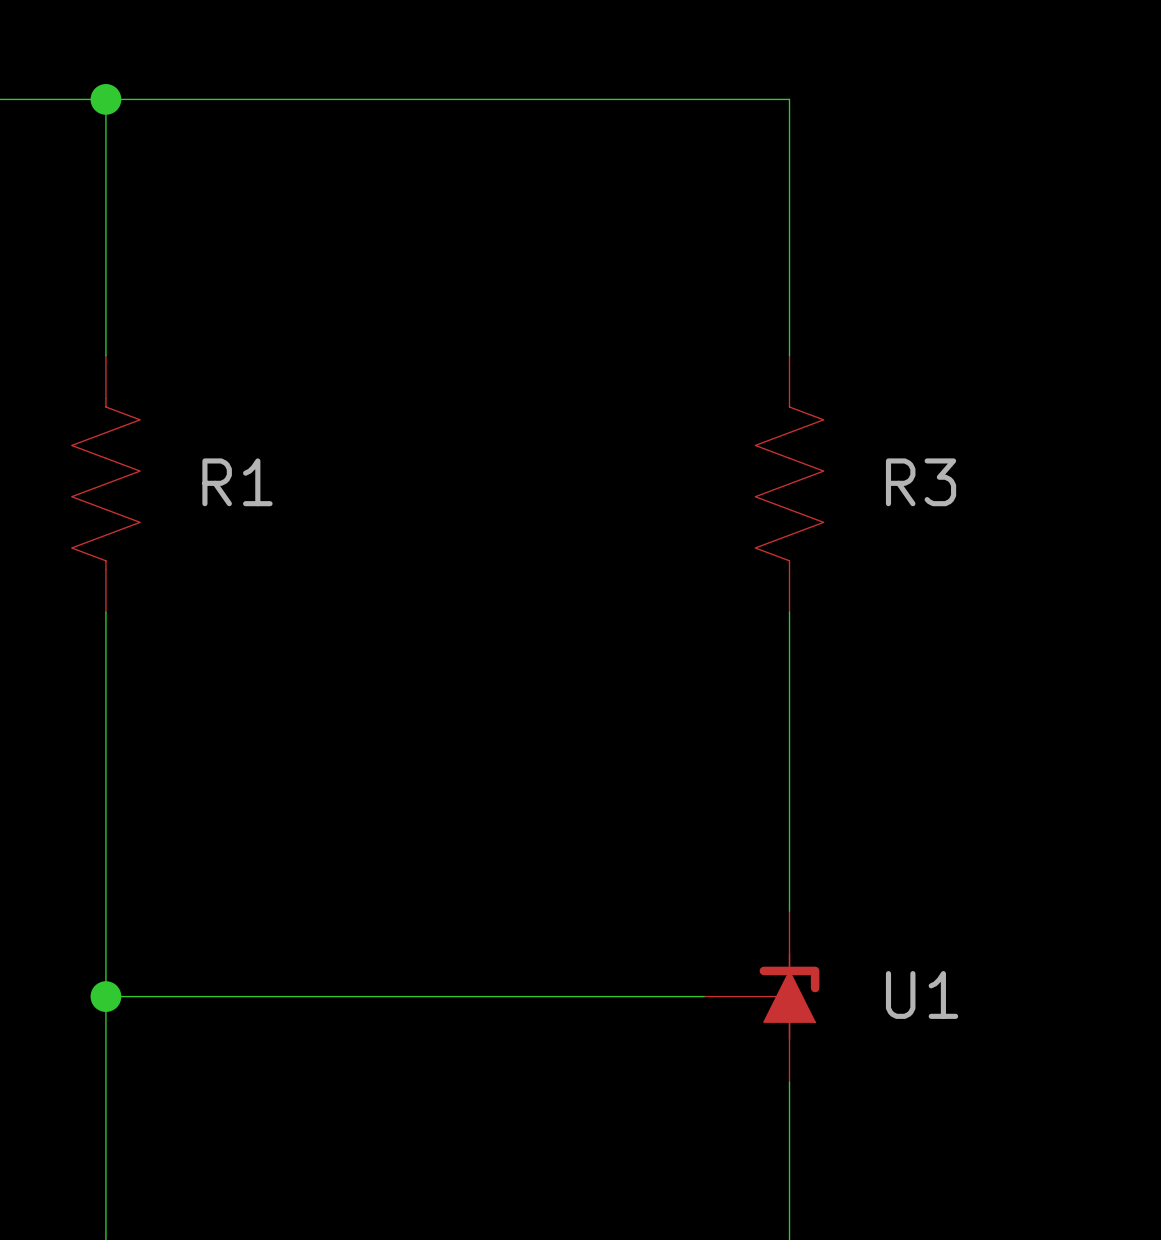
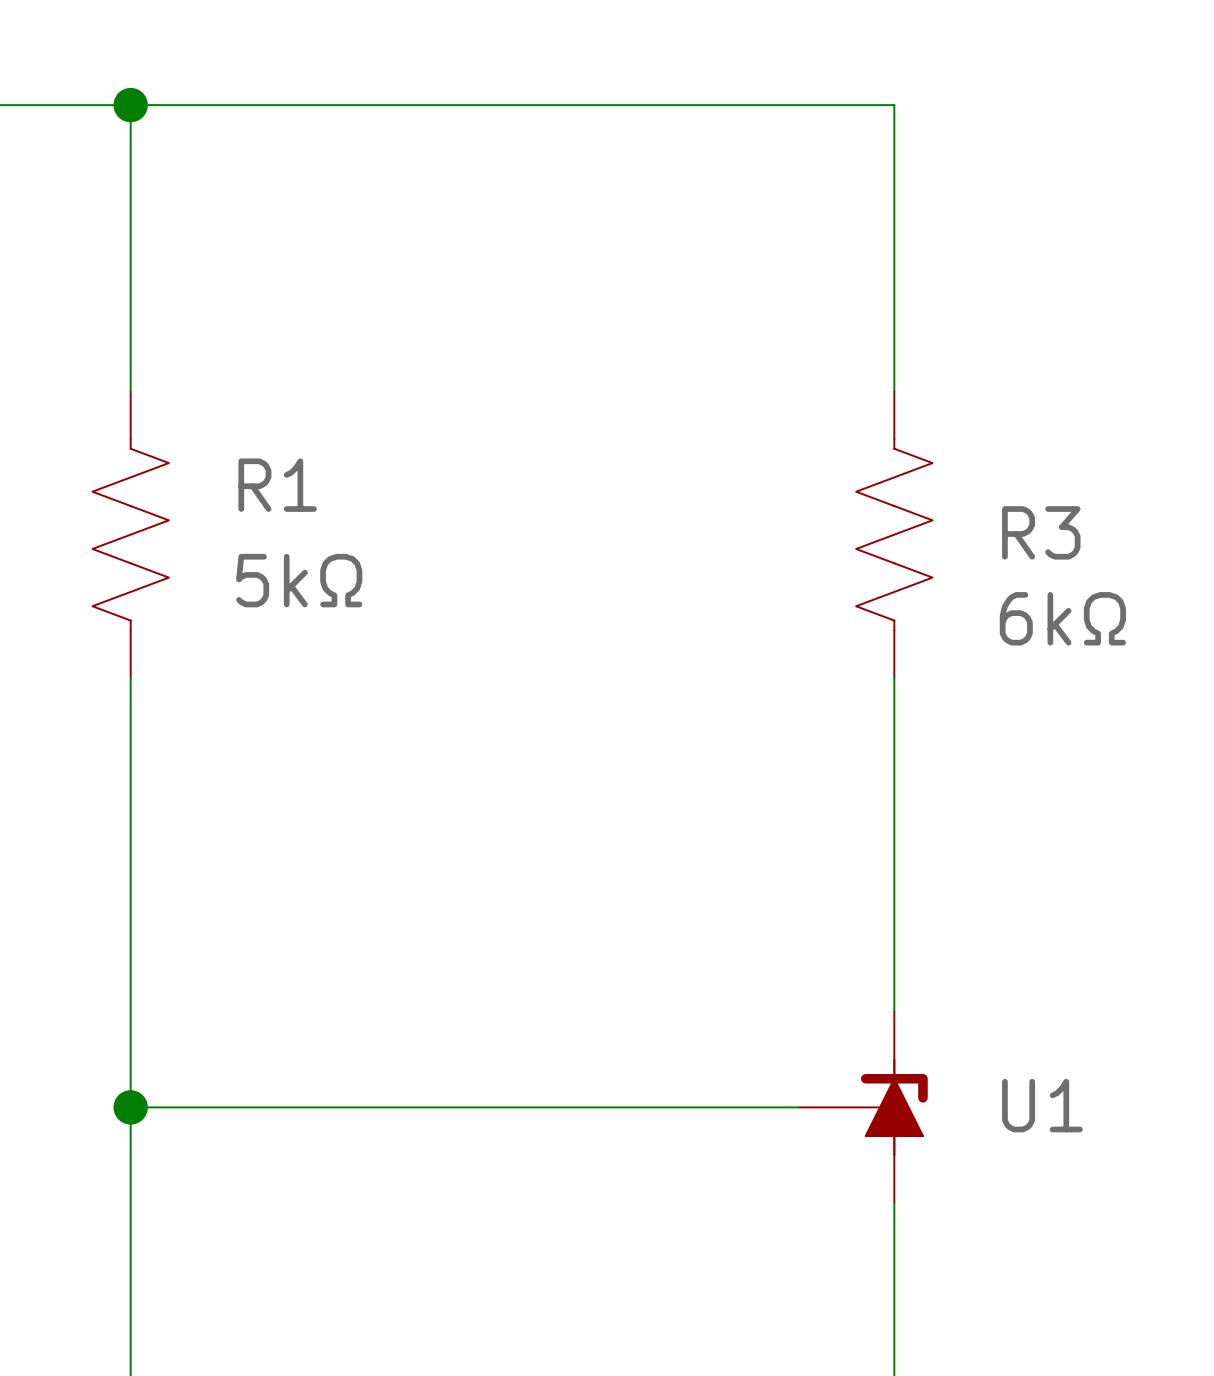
R1 name position: R1 (237, 482) -> R1 (277, 485)
R1 value: none -> 5kΩ (299, 580)
R3 value: none -> 6kΩ (1062, 618)

